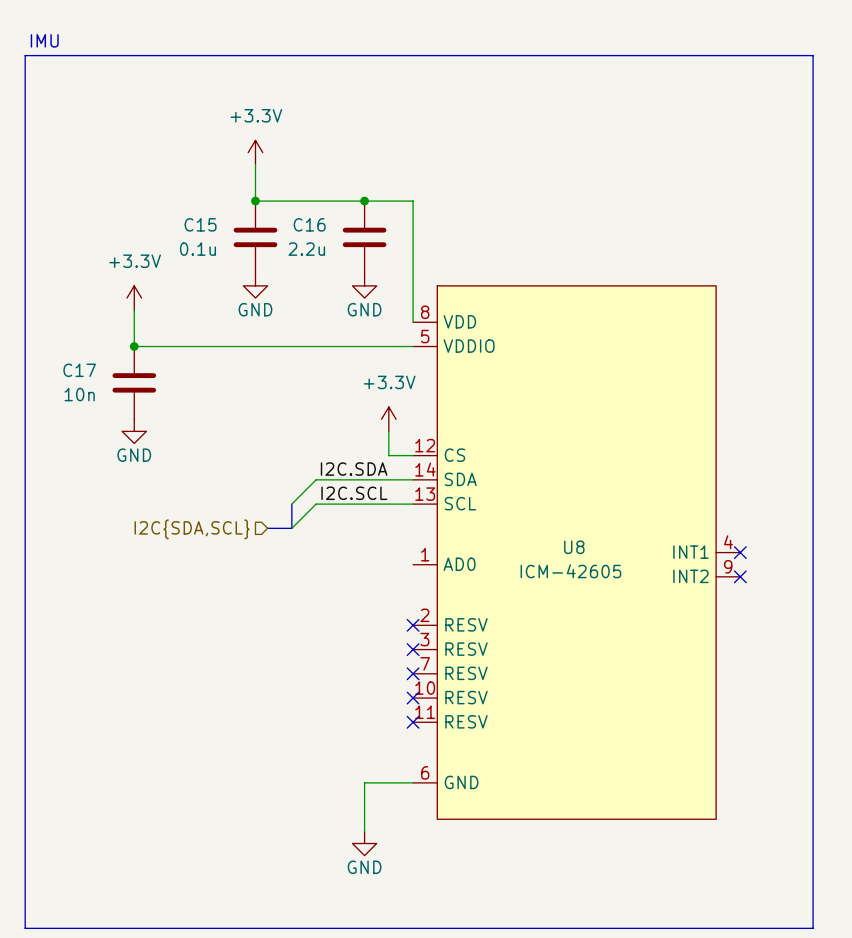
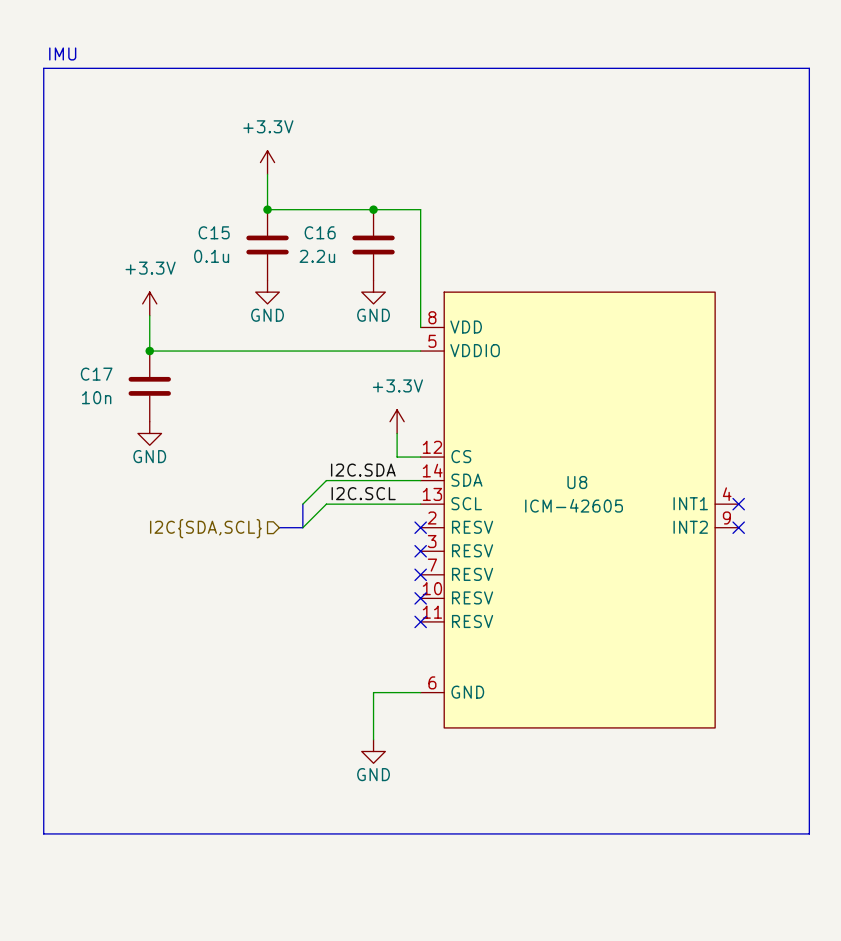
U8 symbol: [413, 285, 741, 820] -> [420, 292, 739, 728]
no-connect mark: none -> (738, 504)
no-connect mark: none -> (420, 527)
no-connect mark: none -> (738, 527)
U8 name position: U8 (574, 547) -> U8 (577, 482)
no-connect mark: none -> (420, 551)
no-connect mark: (740, 552) -> none
U8 value position: ICM-42605 (570, 571) -> ICM-42605 (574, 505)
no-connect mark: none -> (420, 574)
no-connect mark: (740, 576) -> none
no-connect mark: none -> (420, 598)
no-connect mark: (413, 649) -> none
no-connect mark: (413, 673) -> none
no-connect mark: (413, 698) -> none
no-connect mark: (413, 722) -> none
wire: (413, 782) (364, 782) (364, 831) -> (420, 692) (373, 692) (373, 739)
line: (25, 843) (25, 928) (813, 928) (813, 843) -> (43, 833) (809, 833)
power symbol position: GND (364, 843) -> GND (373, 751)

